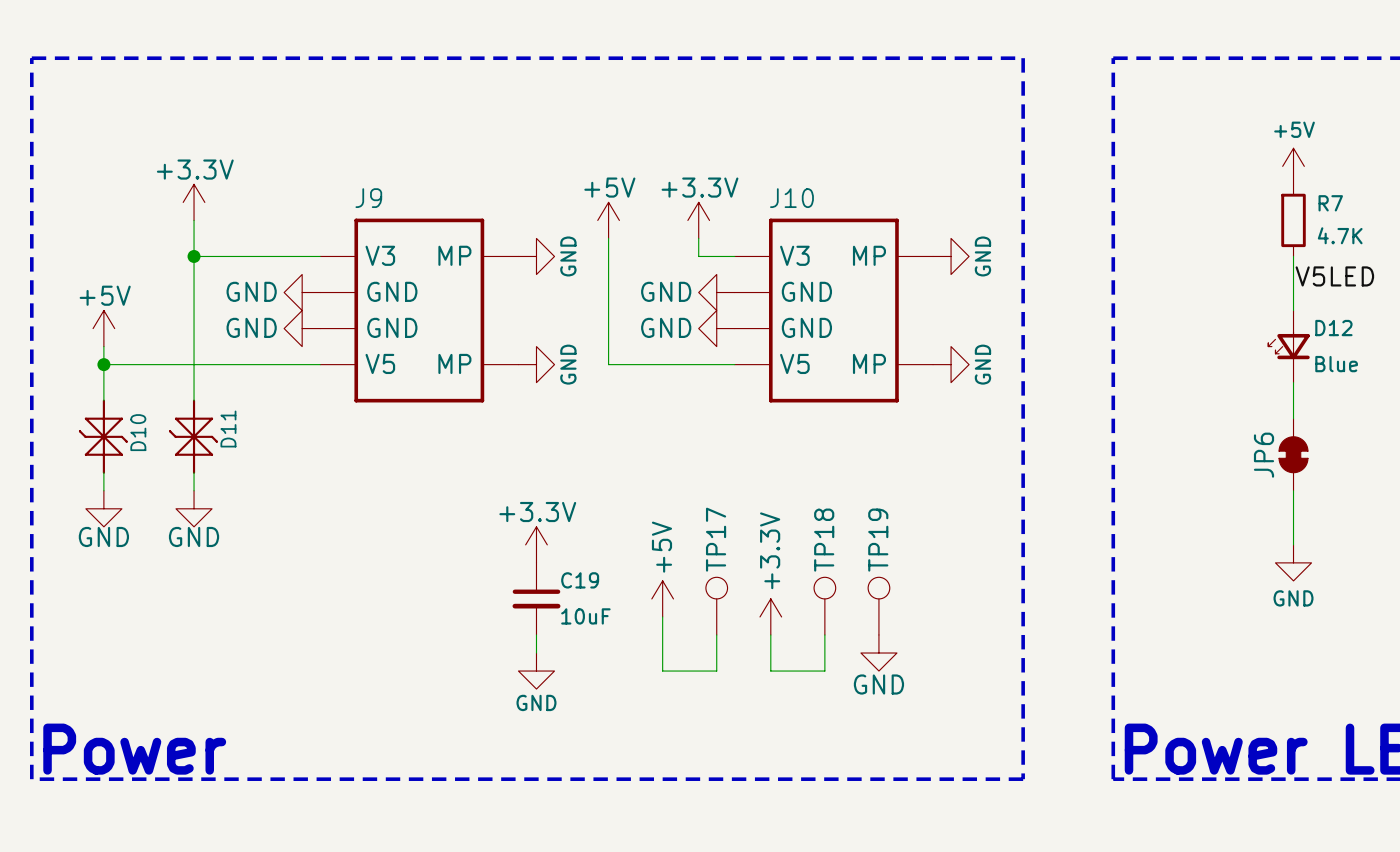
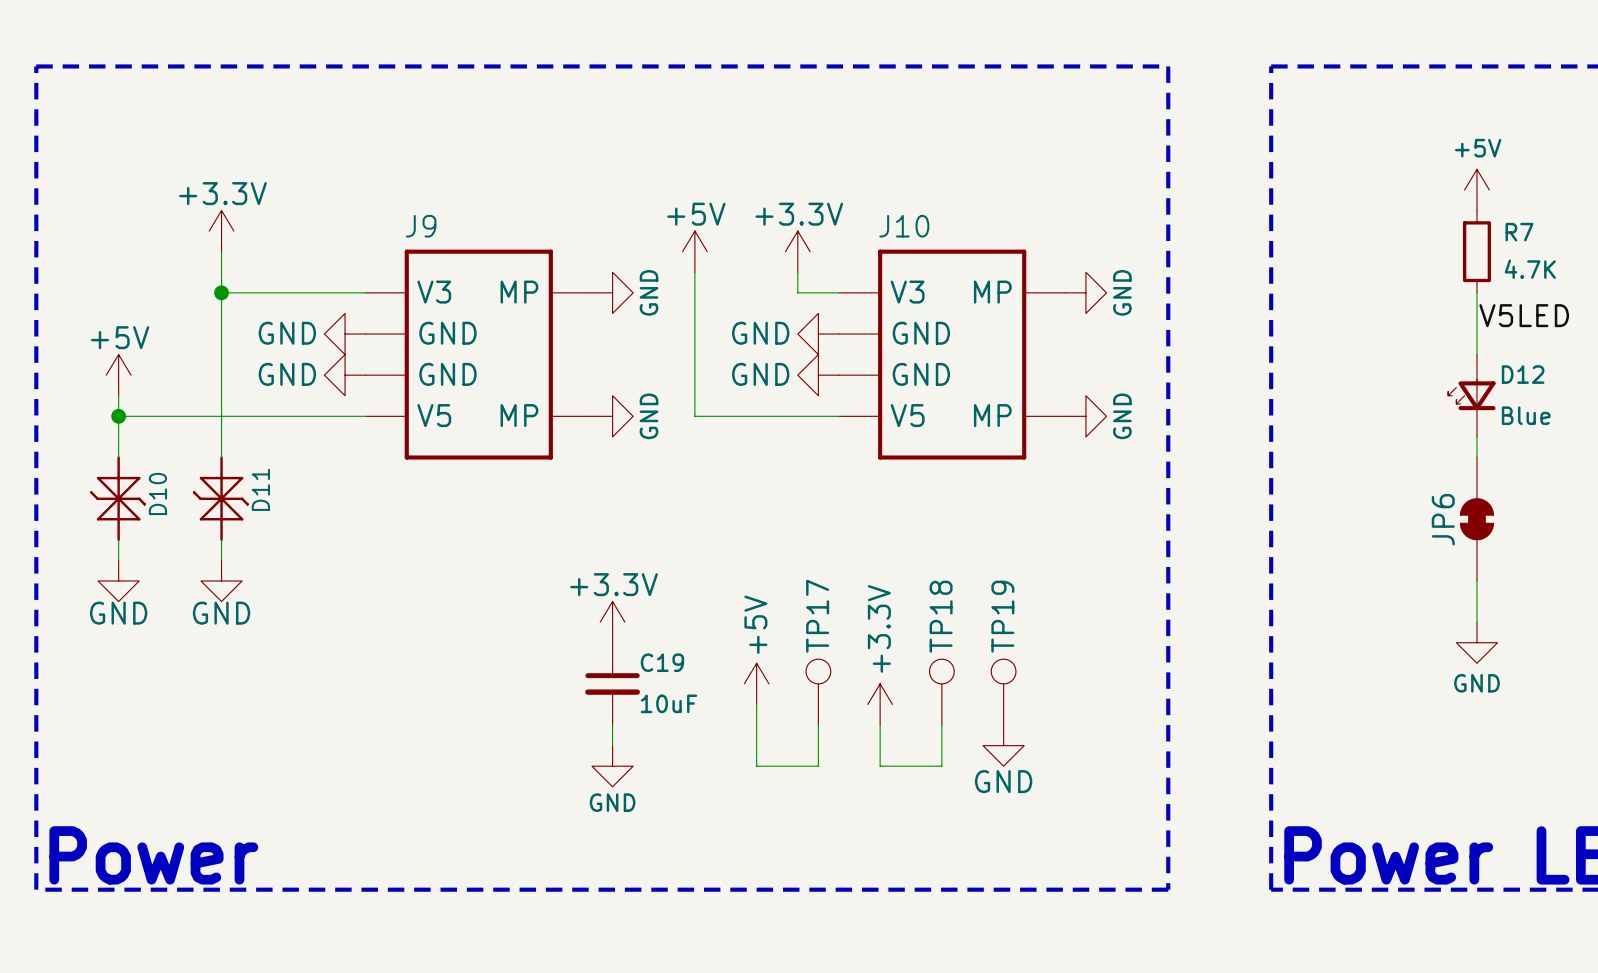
JP6 symbol: [1279, 418, 1308, 491] -> [1460, 457, 1494, 581]

